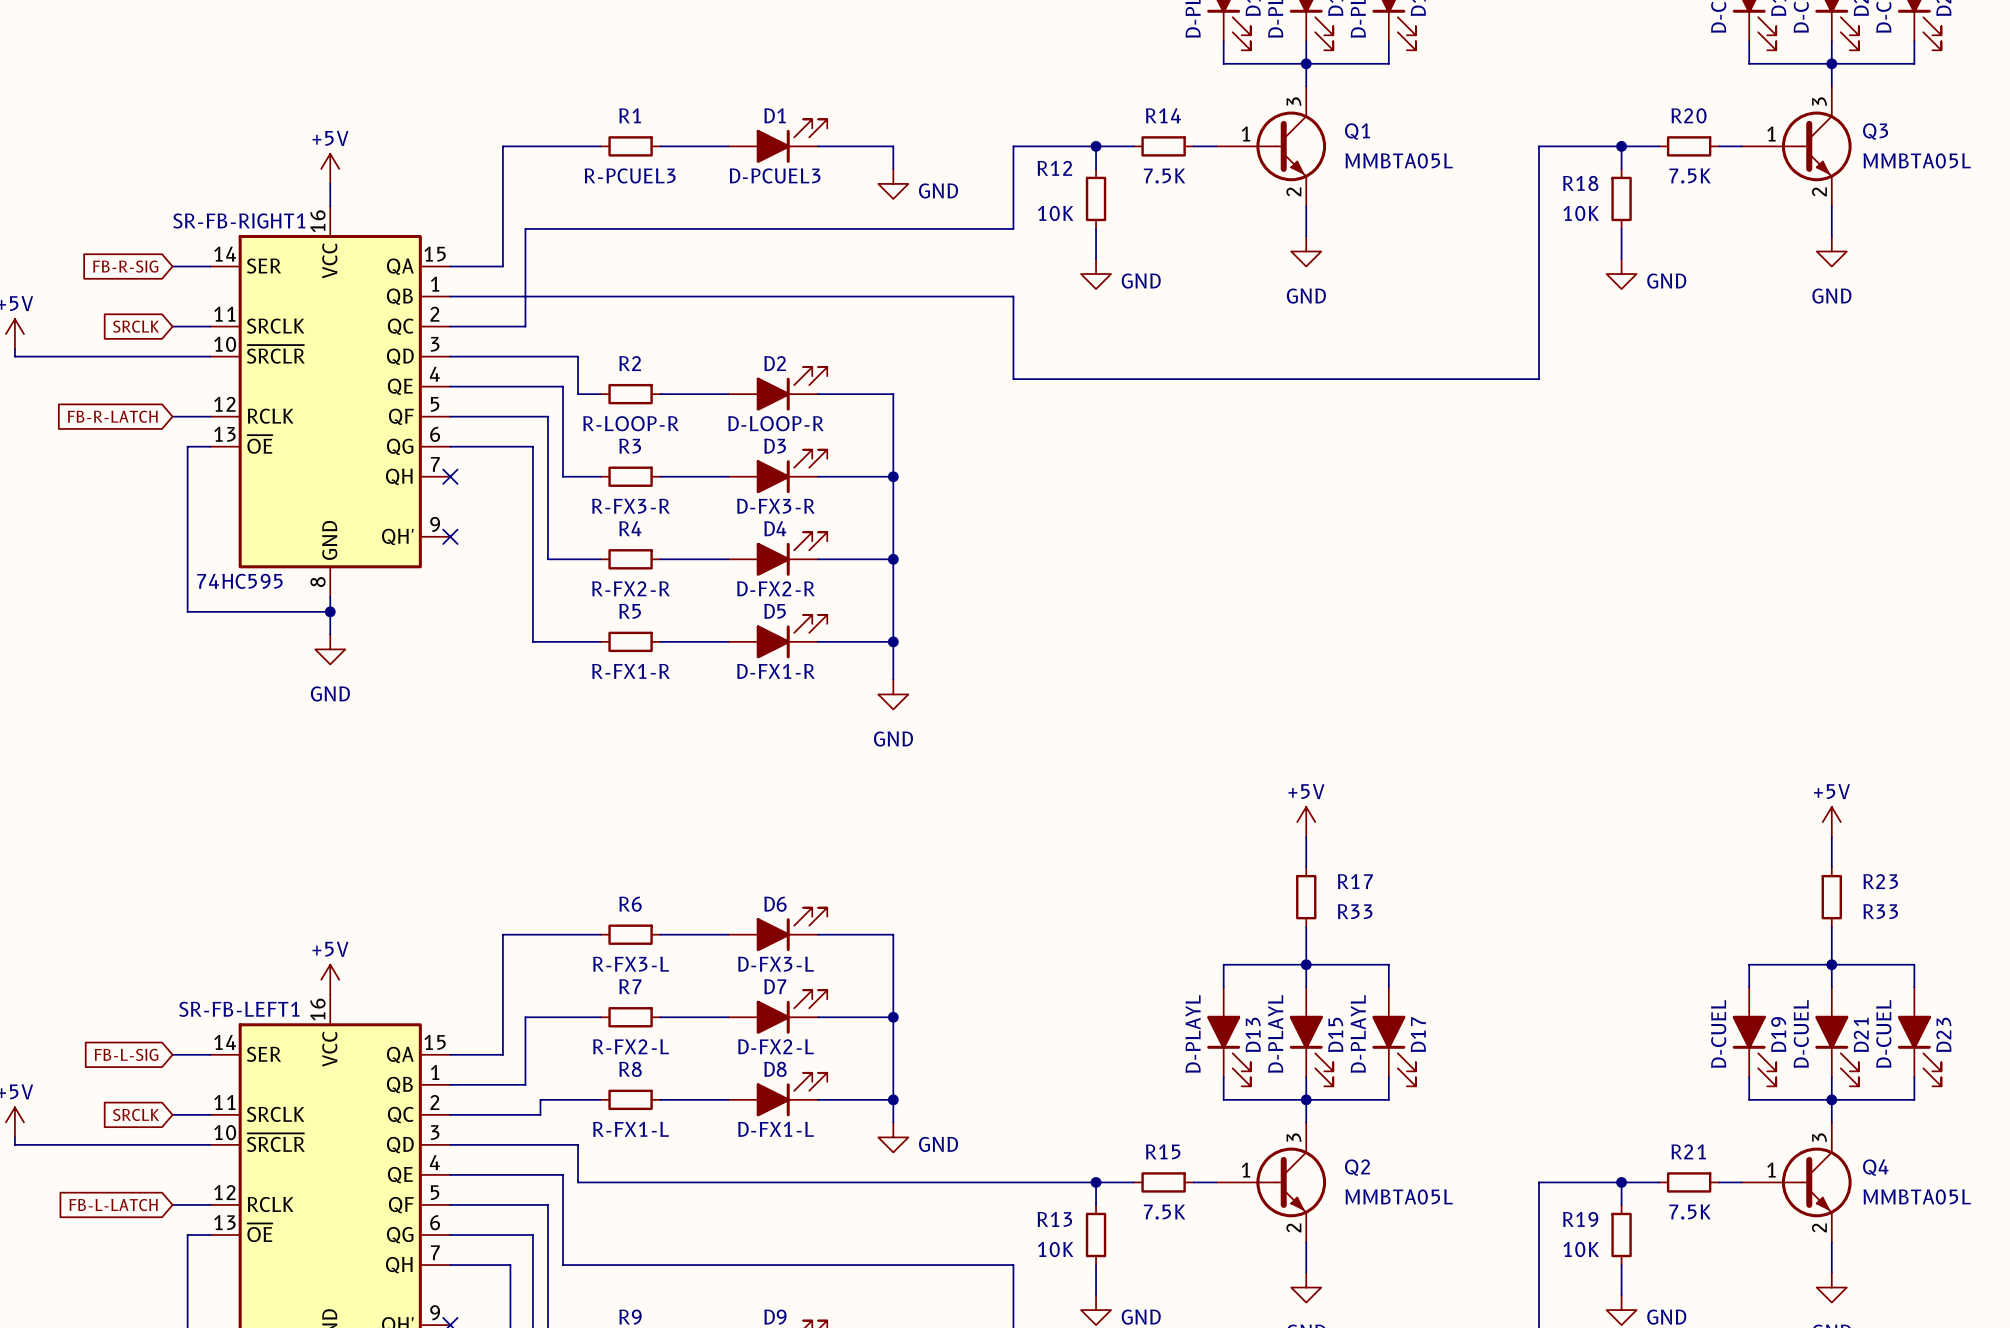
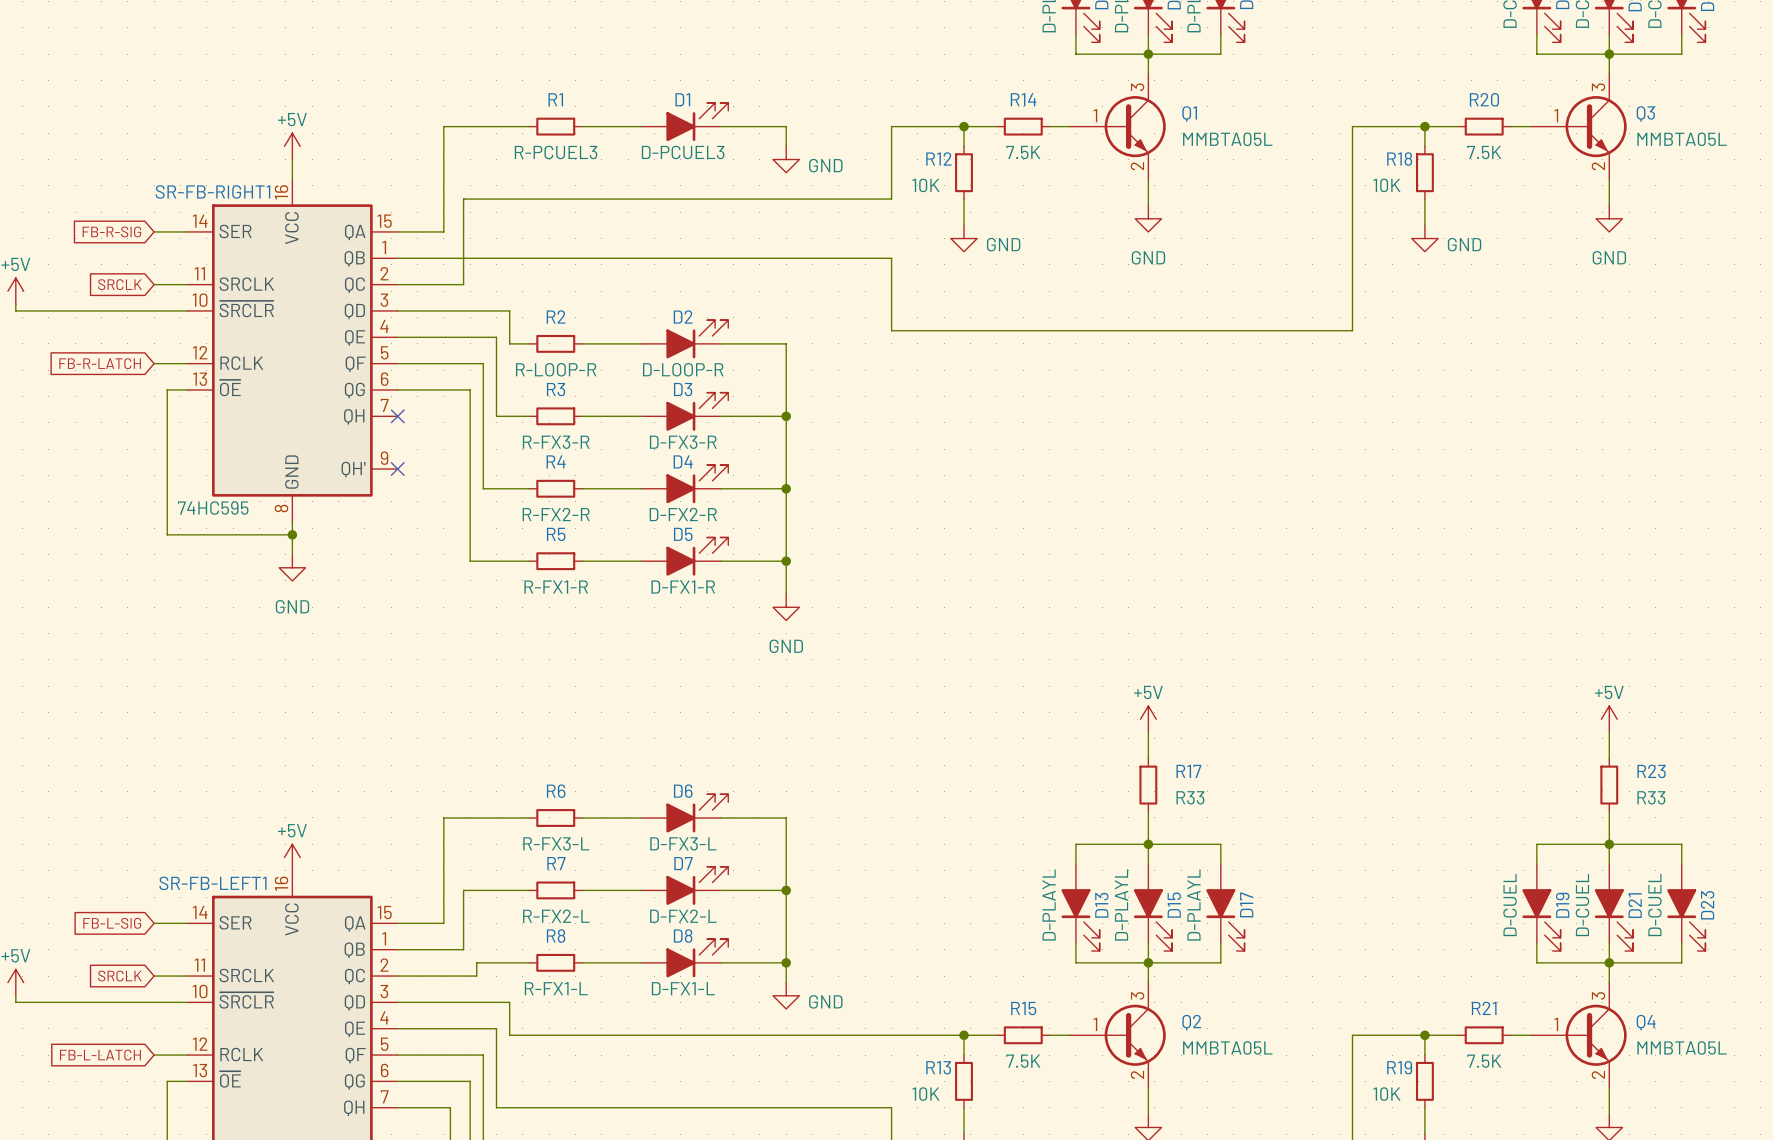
R12 name position: R12 (1054, 168) -> R12 (938, 158)
R18 name position: R18 (1580, 183) -> R18 (1399, 159)
R13 name position: R13 (1054, 1219) -> R13 (938, 1067)
R19 name position: R19 (1580, 1219) -> R19 (1399, 1067)

